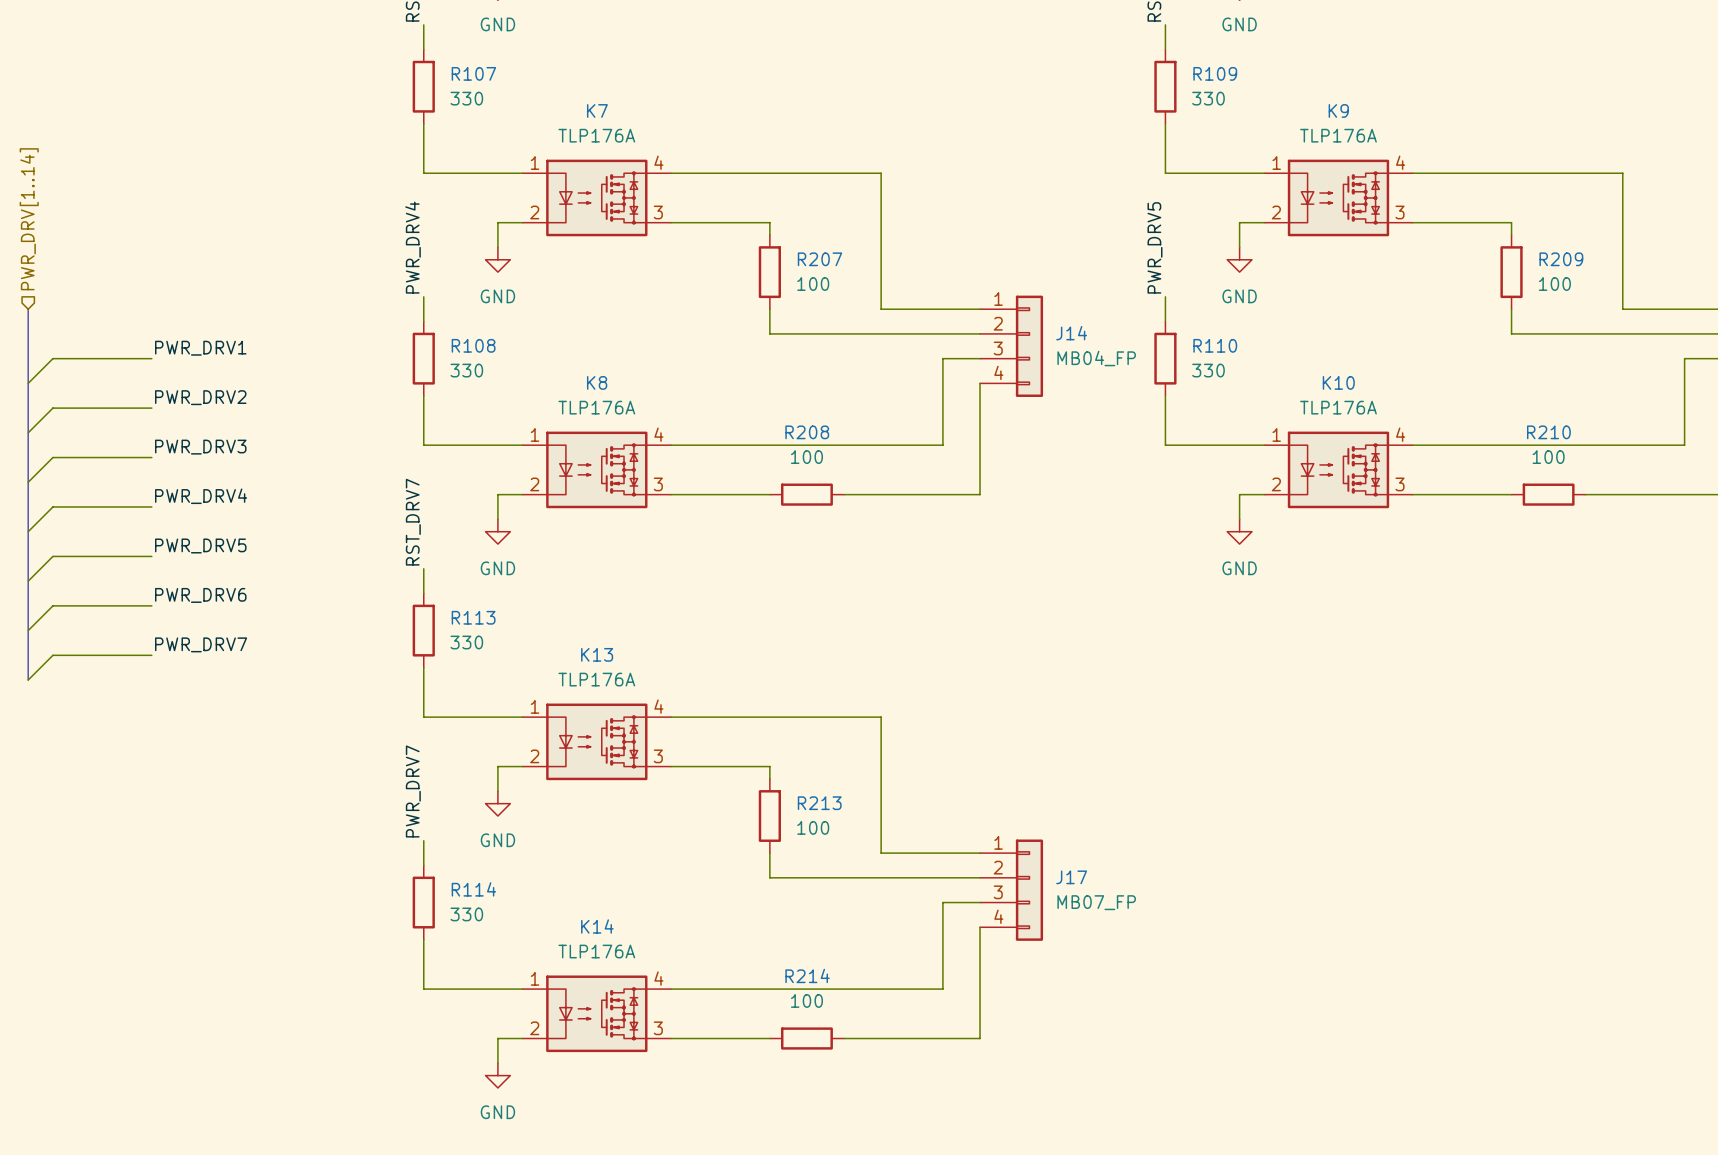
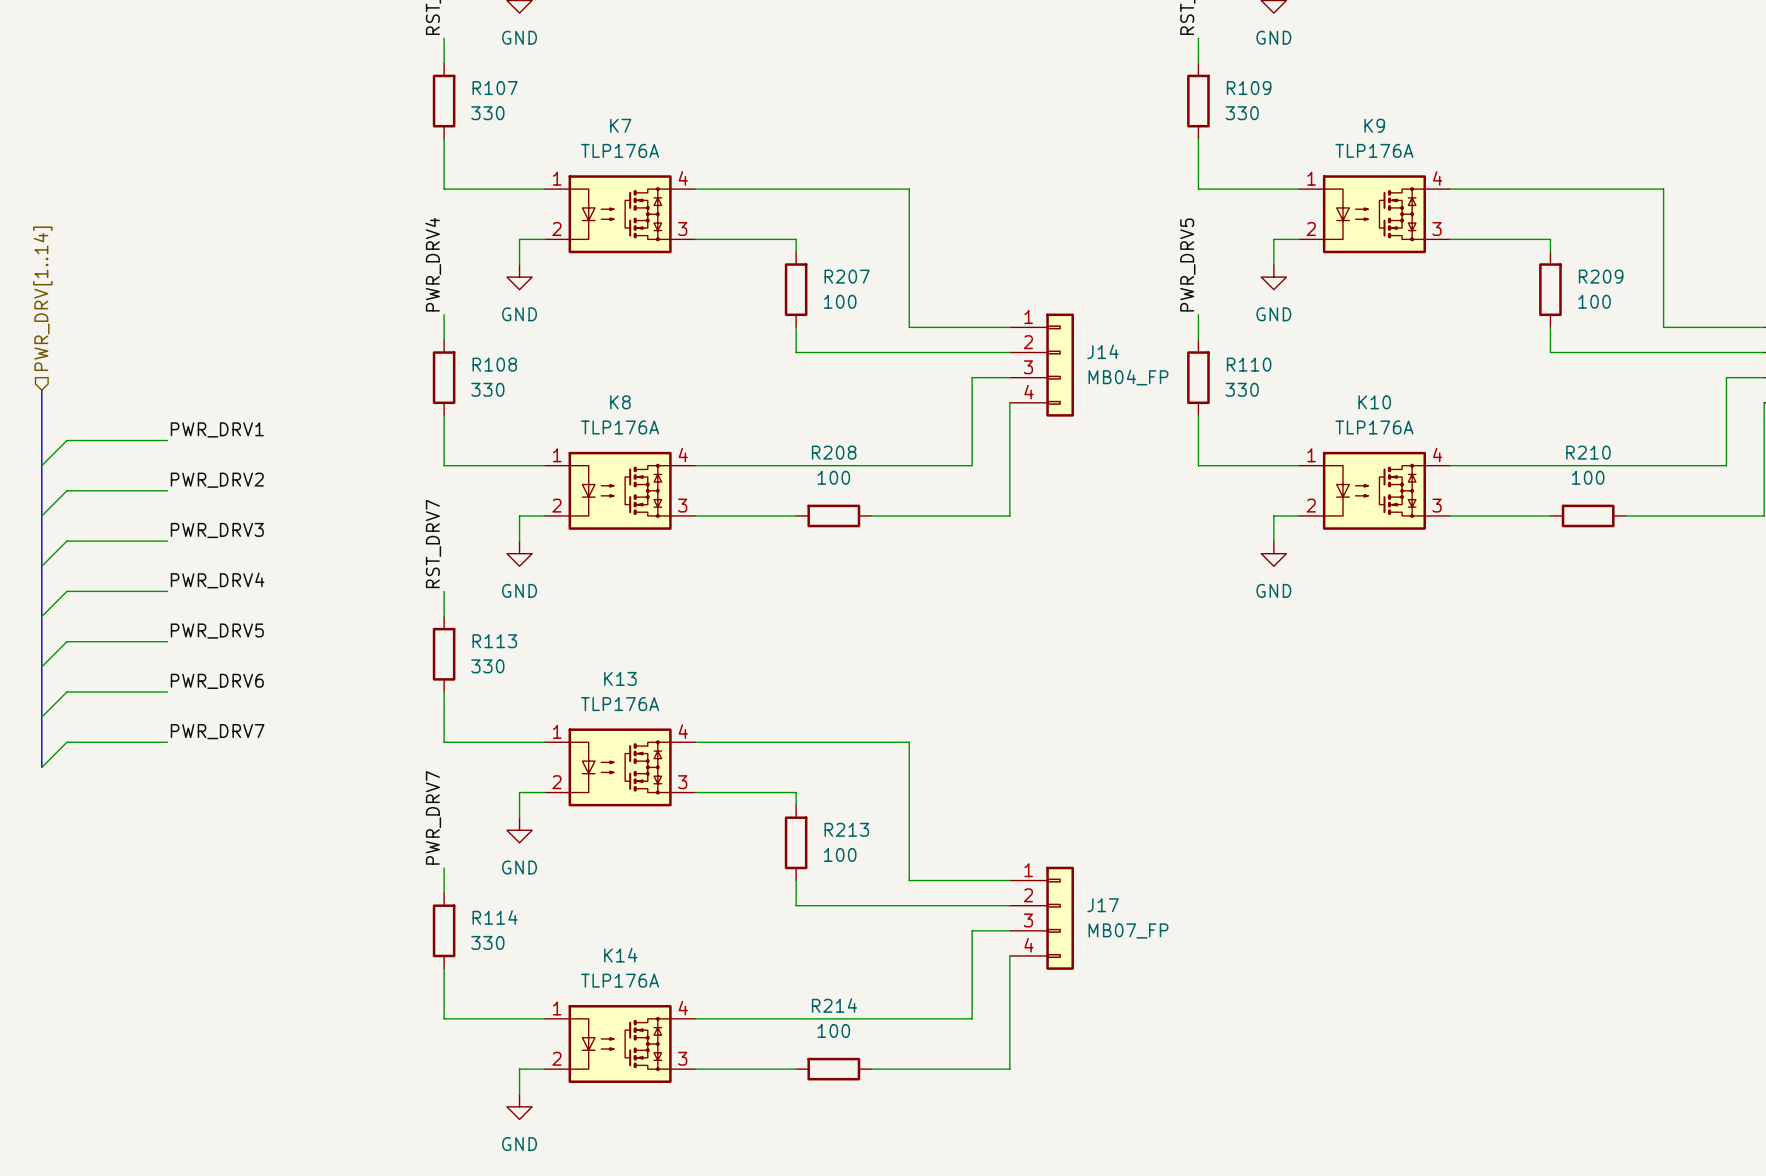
hierarchical label position: PWR_DRV[1..14] (29, 219) -> PWR_DRV[1..14] (42, 298)
bus: (28, 309) (28, 371) -> none
label position: PWR_DRV1 (200, 348) -> PWR_DRV1 (217, 429)
wire: (151, 358) (52, 358) (28, 383) -> (167, 440) (66, 440) (41, 465)
label position: PWR_DRV2 (200, 397) -> PWR_DRV2 (217, 480)
wire: (151, 408) (52, 408) (28, 432) -> (167, 490) (66, 490) (41, 515)
label position: PWR_DRV3 (200, 447) -> PWR_DRV3 (217, 530)
wire: (151, 457) (52, 457) (28, 482) -> (167, 541) (66, 541) (41, 566)
label position: PWR_DRV4 (201, 496) -> PWR_DRV4 (217, 580)
wire: (151, 506) (52, 506) (28, 531) -> (167, 591) (66, 591) (41, 616)
label position: PWR_DRV5 (200, 545) -> PWR_DRV5 (217, 631)
wire: (151, 556) (52, 556) (28, 581) -> (167, 641) (66, 641) (41, 666)
label position: PWR_DRV6 (200, 595) -> PWR_DRV6 (217, 681)
wire: (151, 605) (52, 605) (28, 630) -> (167, 691) (66, 691) (41, 717)
label position: PWR_DRV7 (201, 644) -> PWR_DRV7 (217, 731)
wire: (151, 655) (52, 655) (28, 680) -> (167, 742) (66, 742) (41, 767)
bus: none -> (41, 704) (41, 767)

